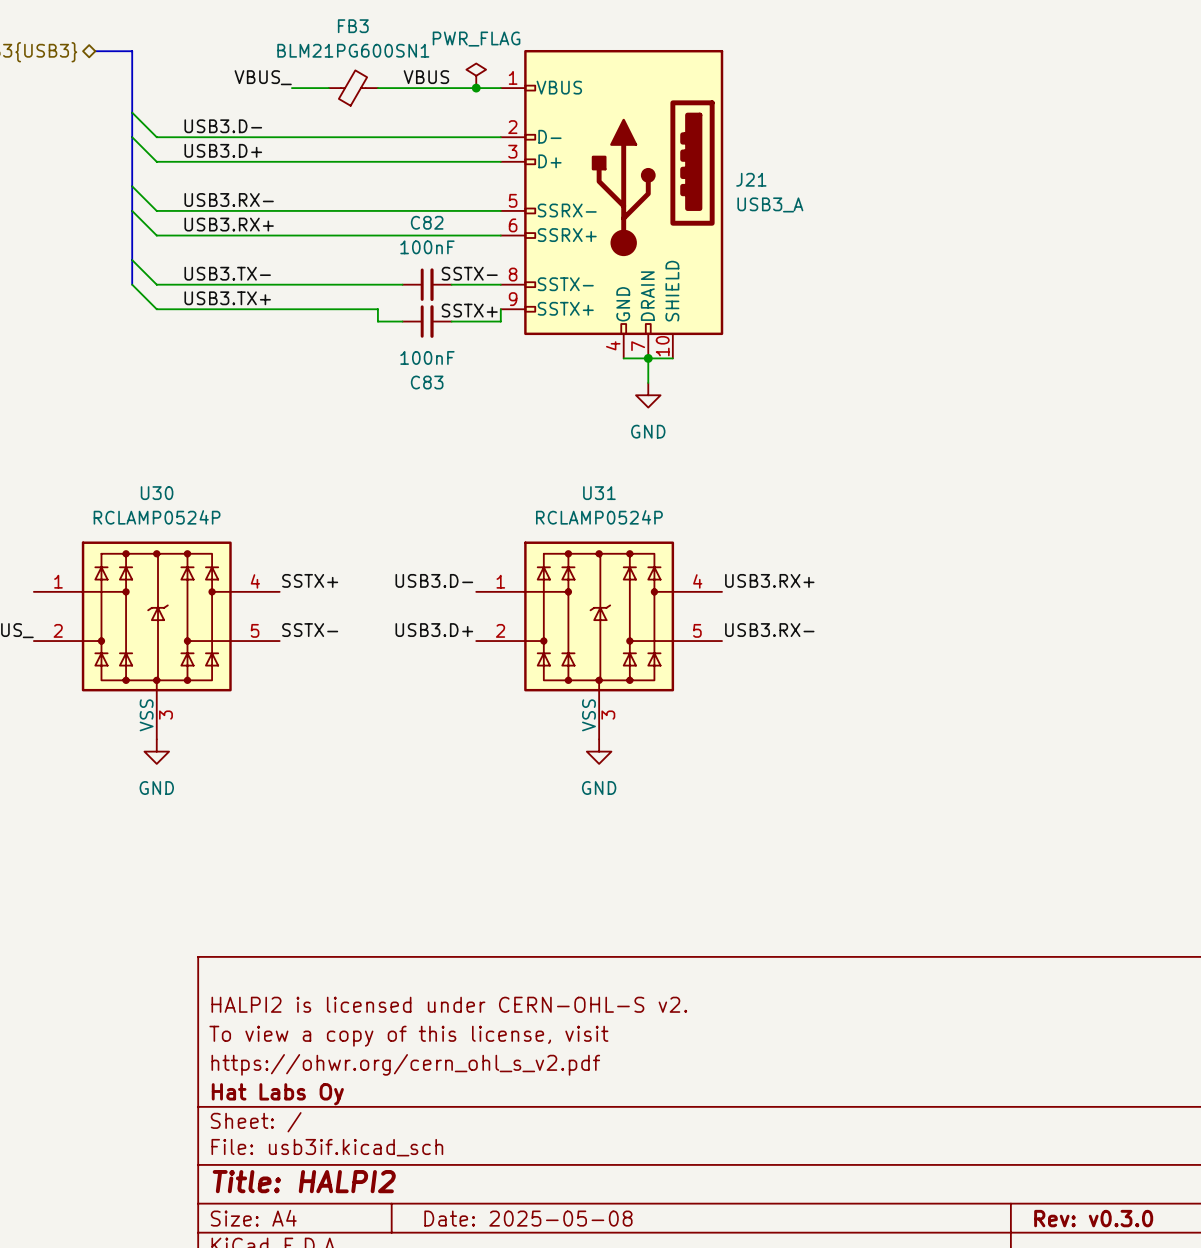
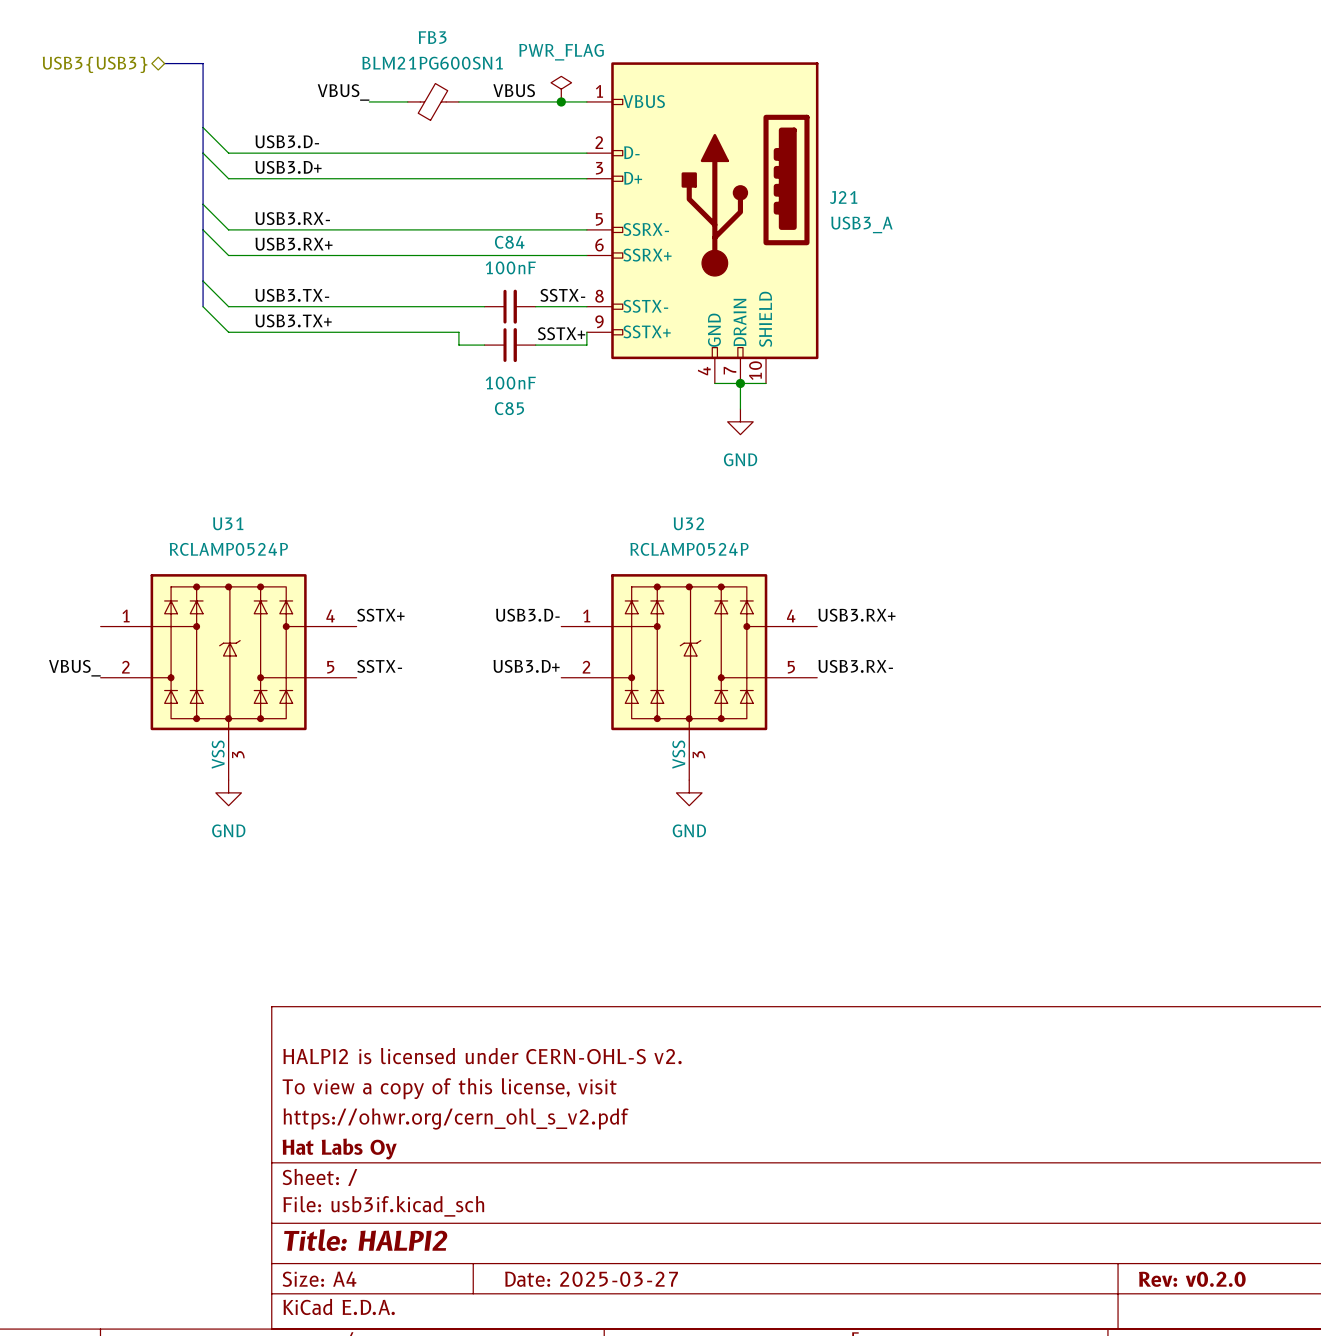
C82 name: C82 (427, 222) -> C84 (509, 242)
C83 name: C83 (427, 382) -> C85 (509, 408)
U30 name: U30 (157, 493) -> U31 (228, 523)
U31 name: U31 (599, 493) -> U32 (688, 523)
title block: Date: 2025-05-08 (528, 1218) -> Date: 2025-03-27 (591, 1279)
title block: Rev: v0.3.0 (1093, 1218) -> Rev: v0.2.0 (1192, 1279)

